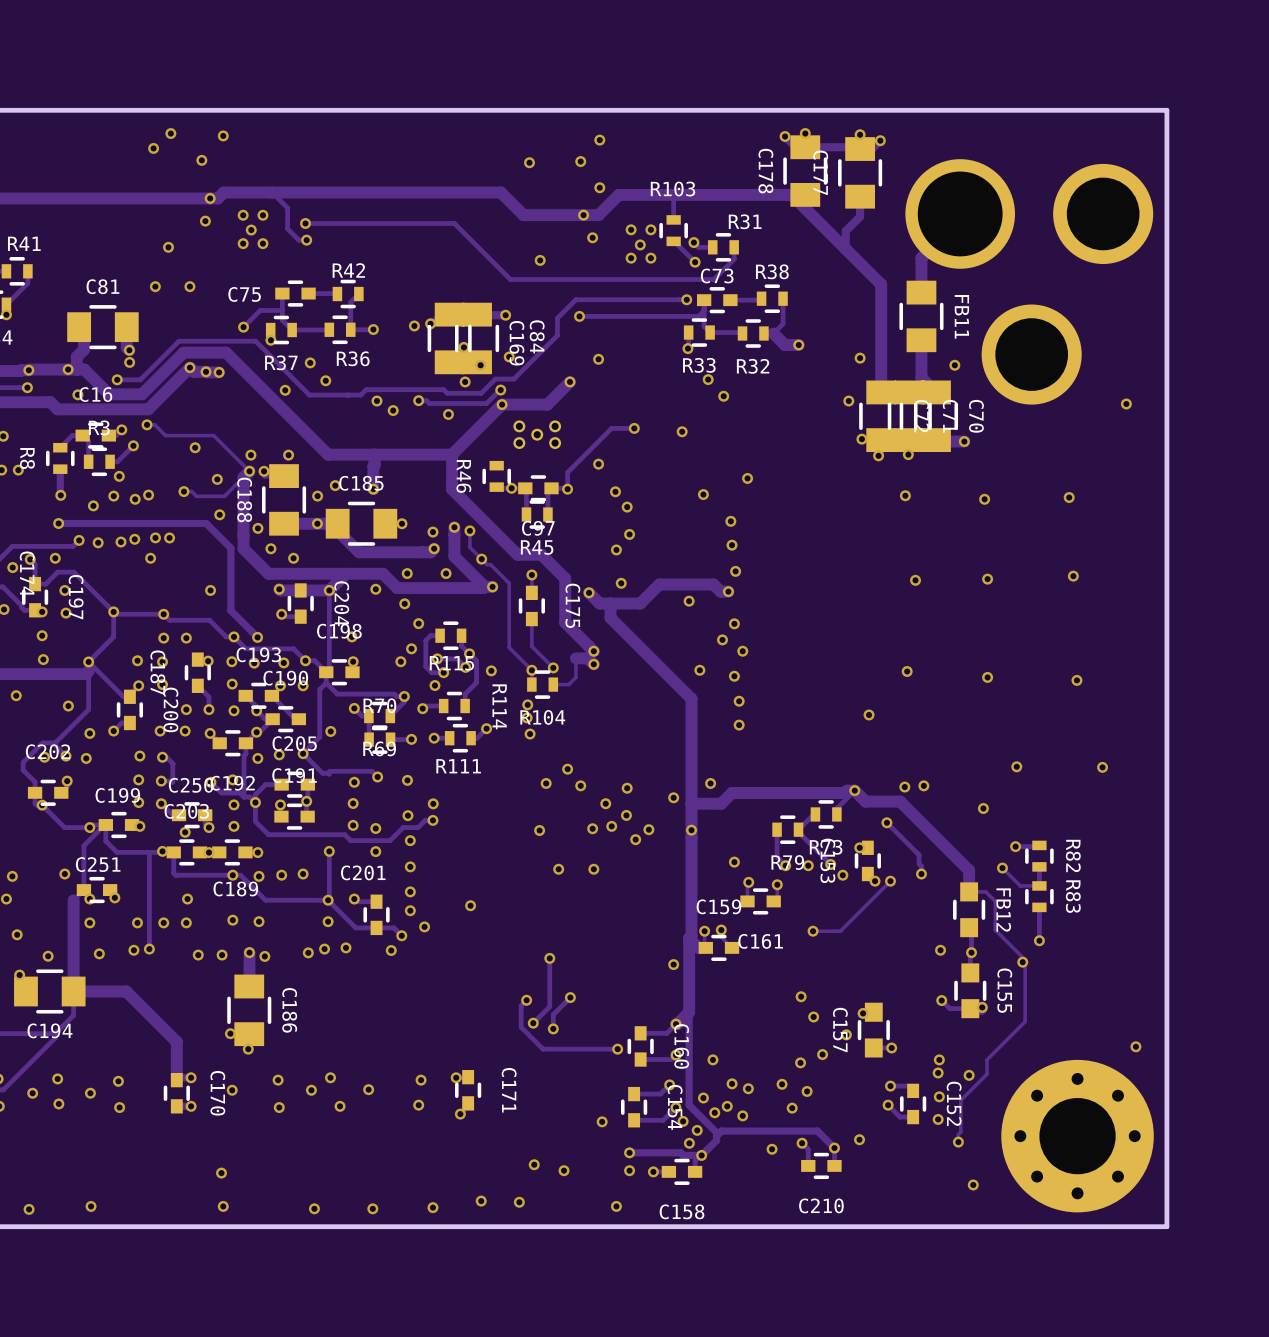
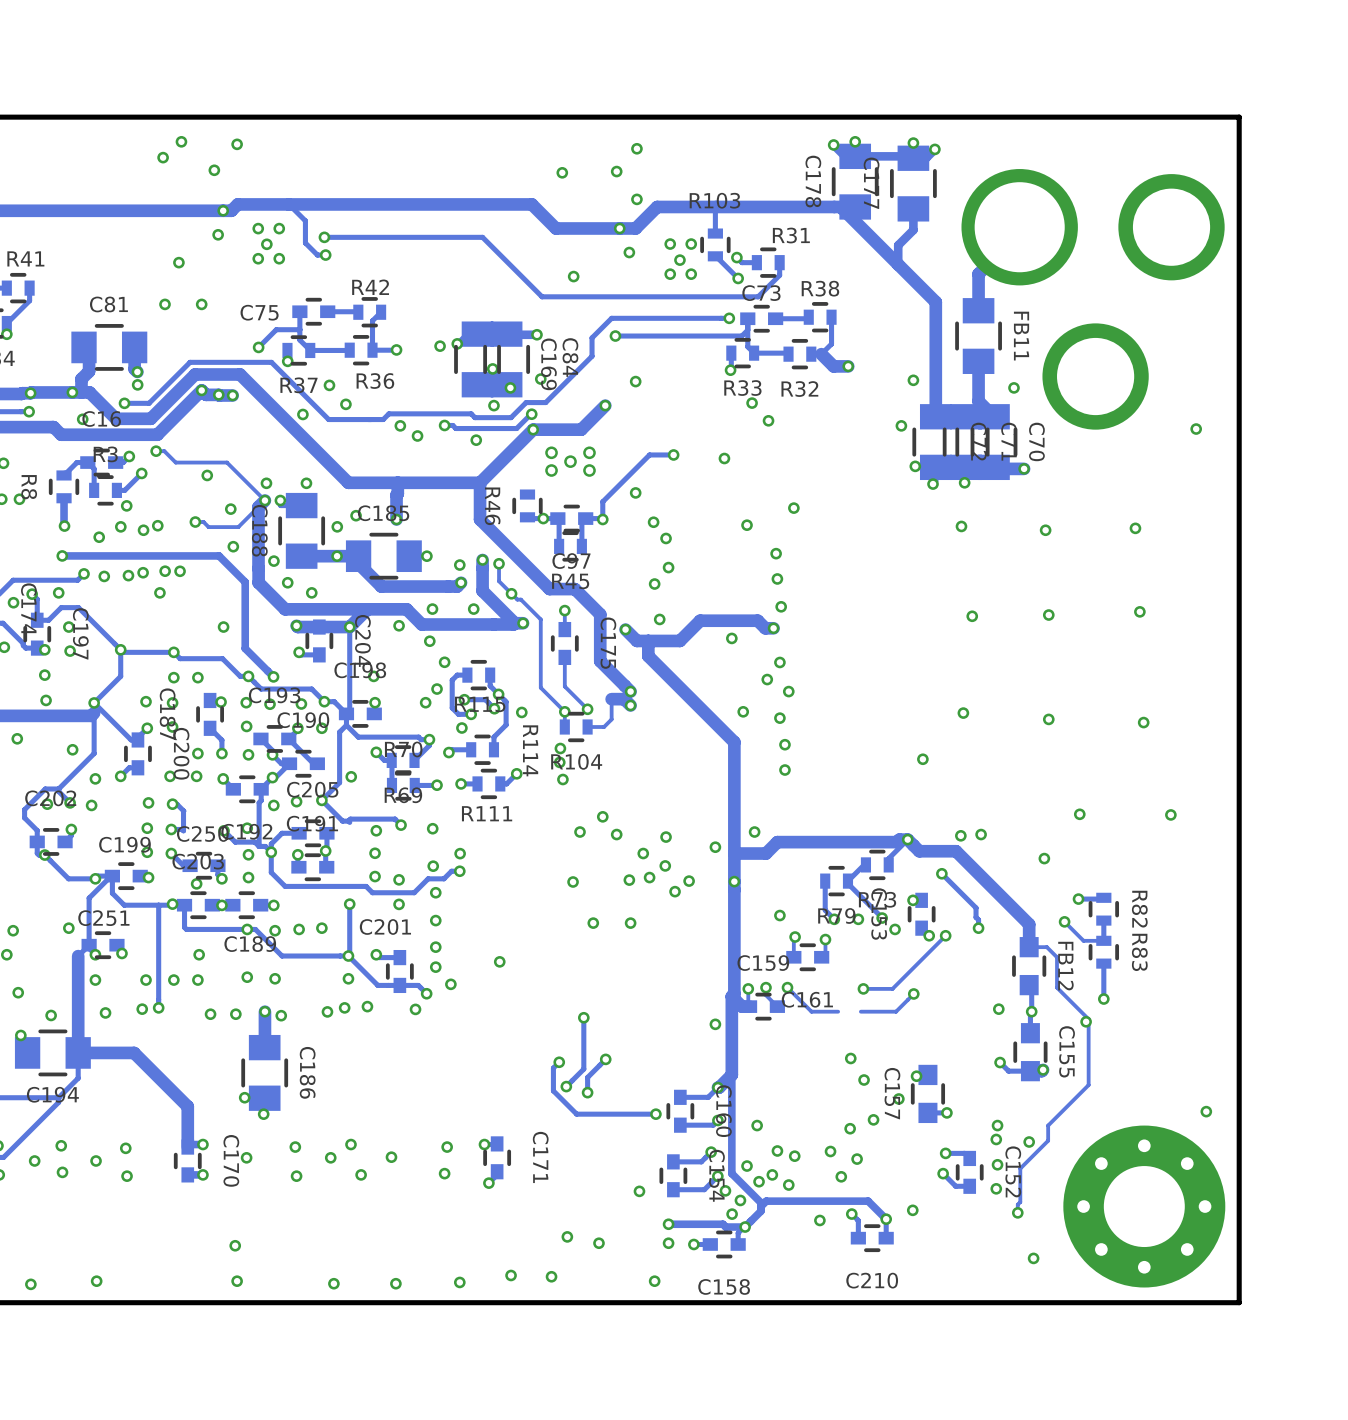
track: none -> (787, 987) (811, 1011) (838, 1011)
via: none -> (787, 987)
track: none -> (913, 993) (896, 1011) (860, 1011)
via: none -> (913, 993)

